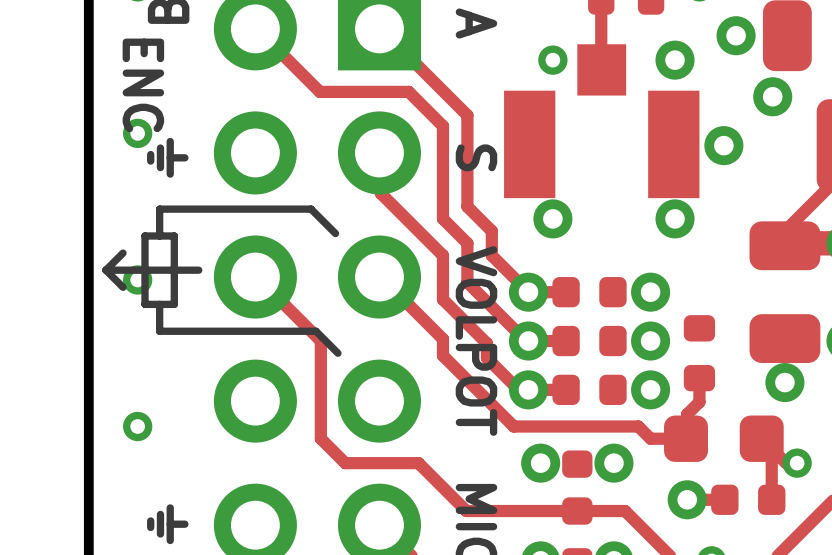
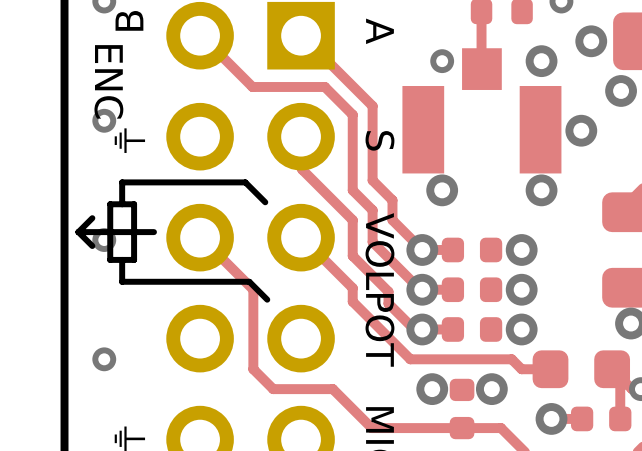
part: (699, 353) -> none
top track: (699, 378) (699, 402) (687, 414) (686, 438) -> none

